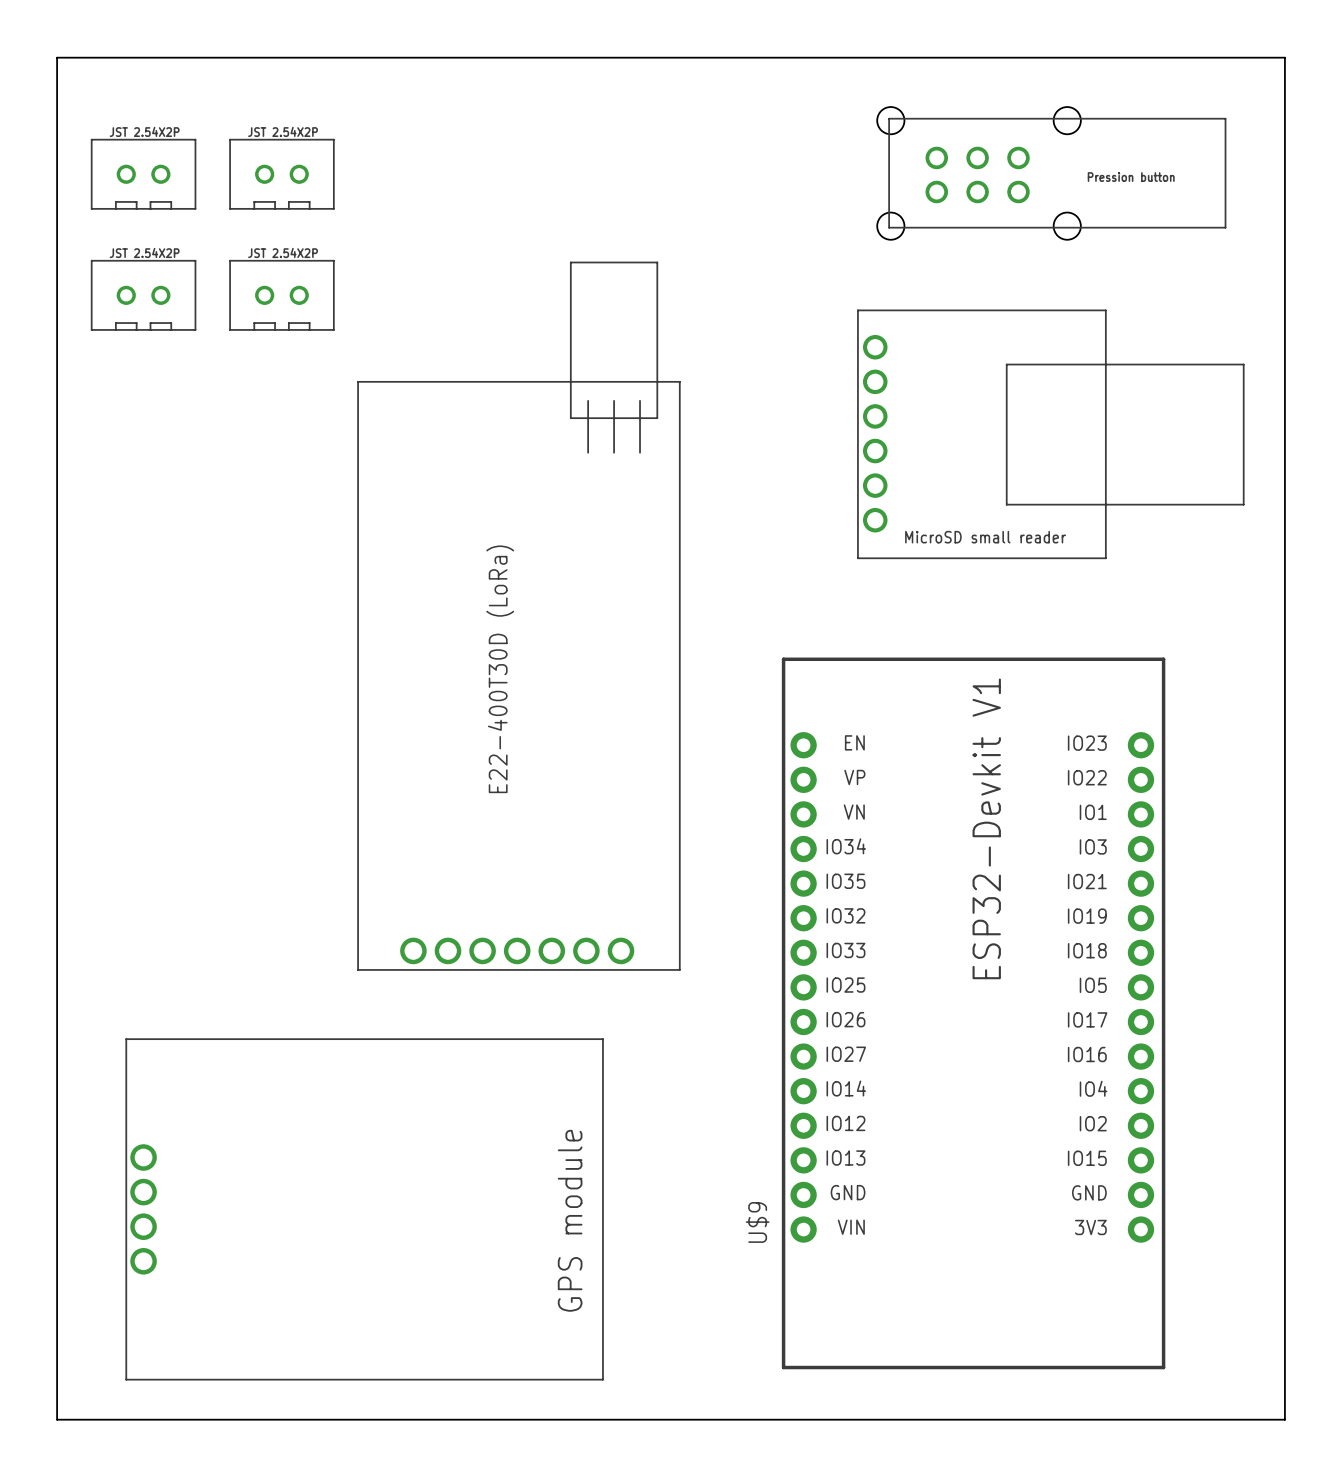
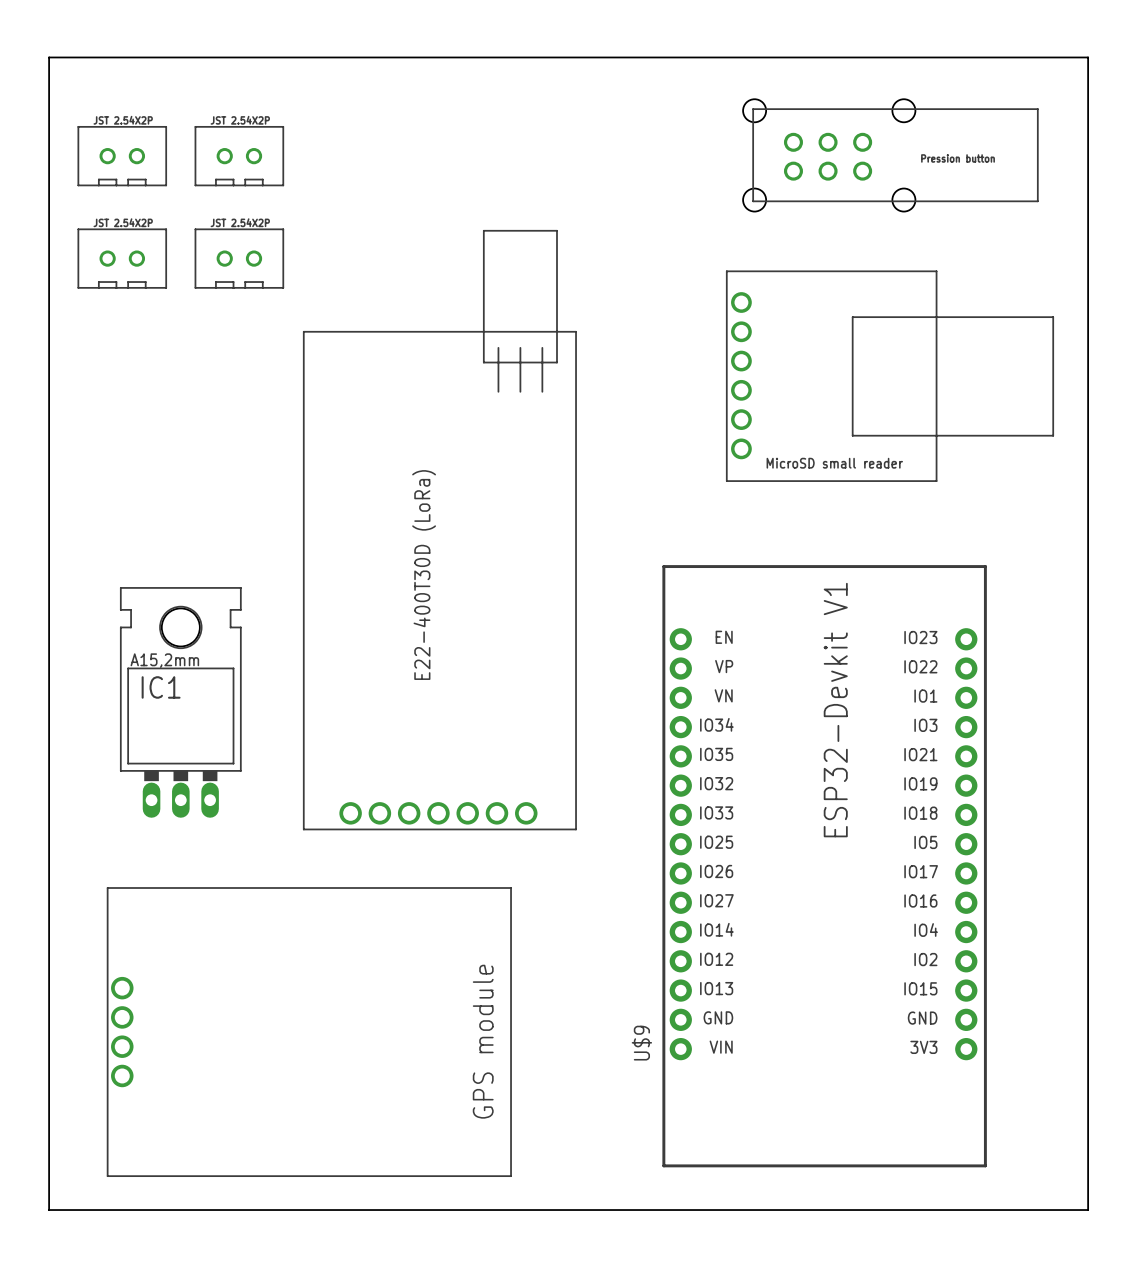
IC1: none -> (180, 702)

